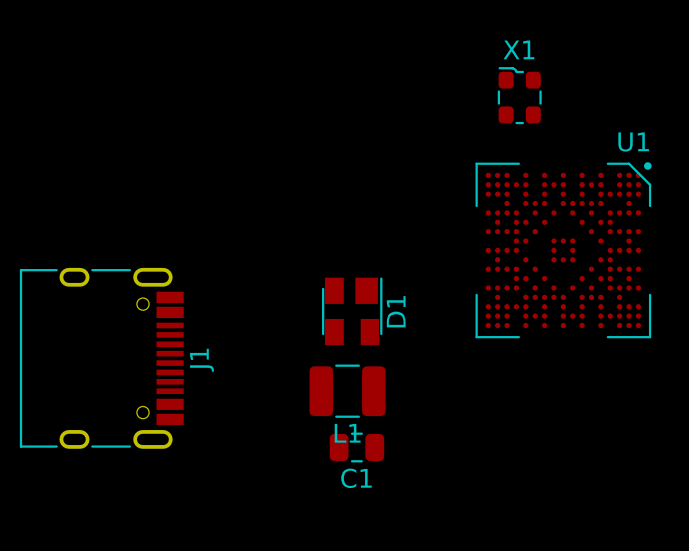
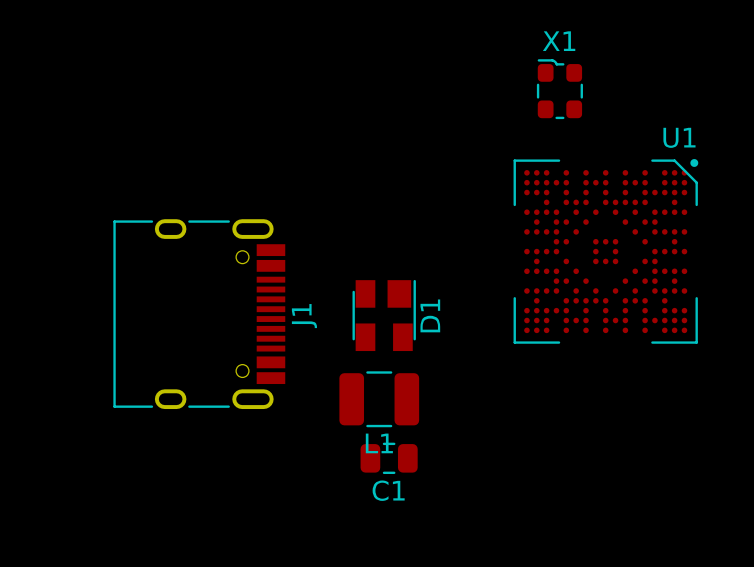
J1 position: (101, 358) -> (199, 314)

